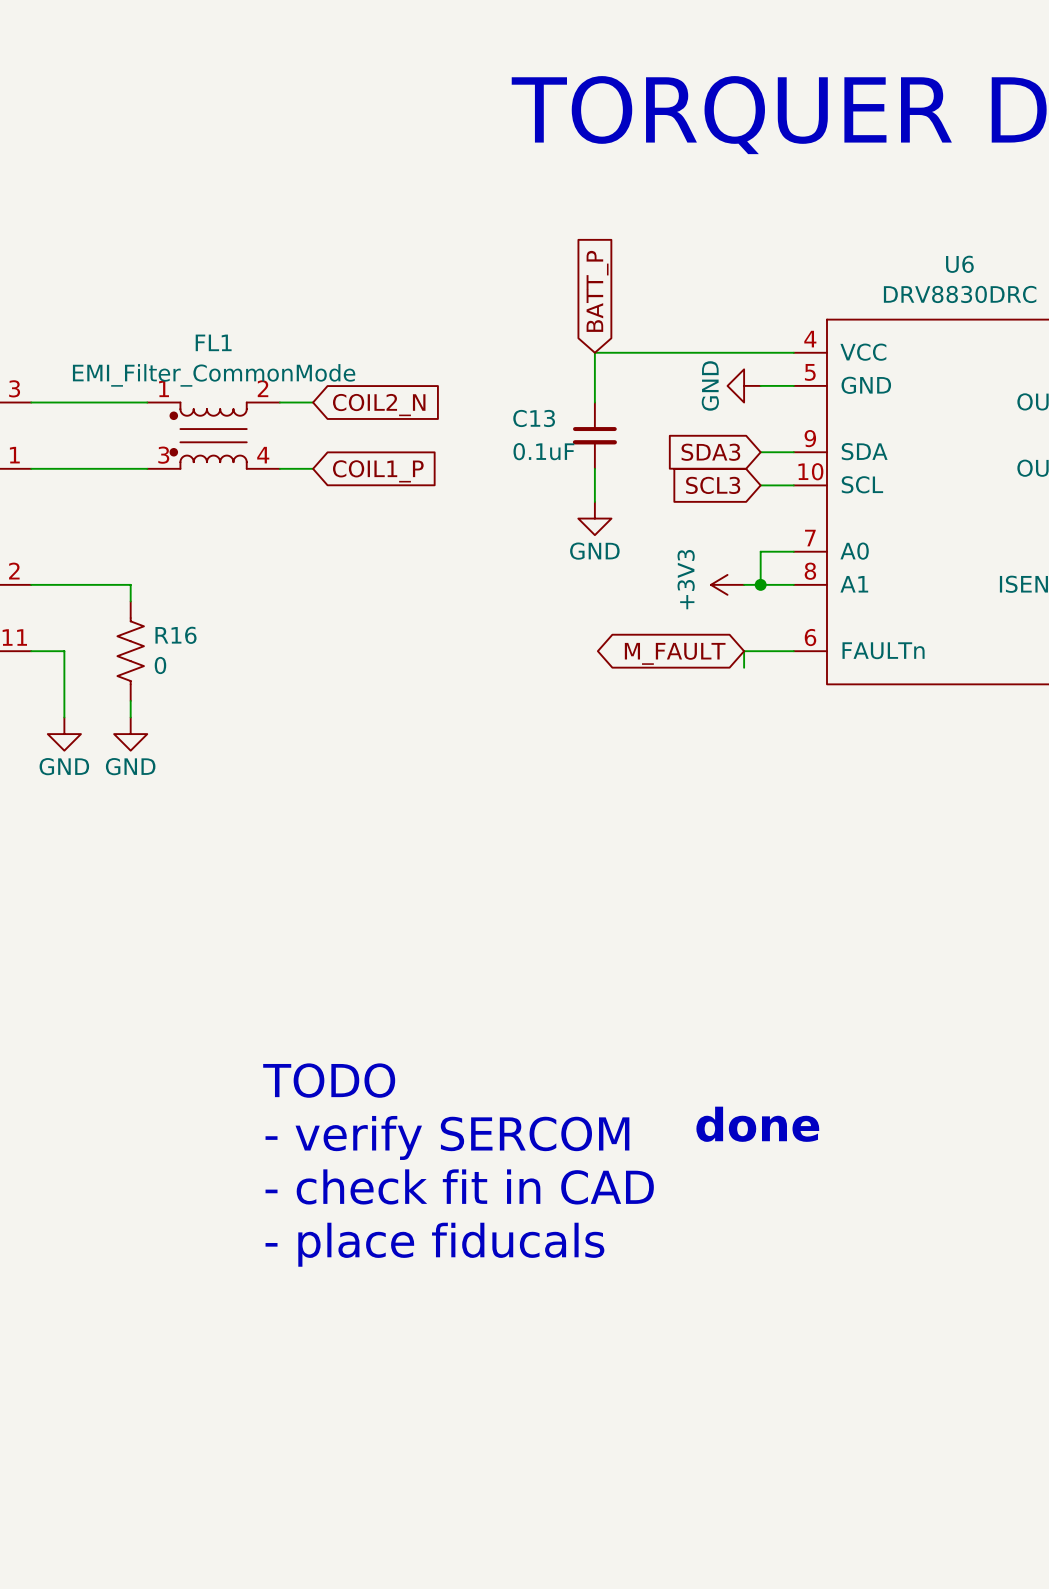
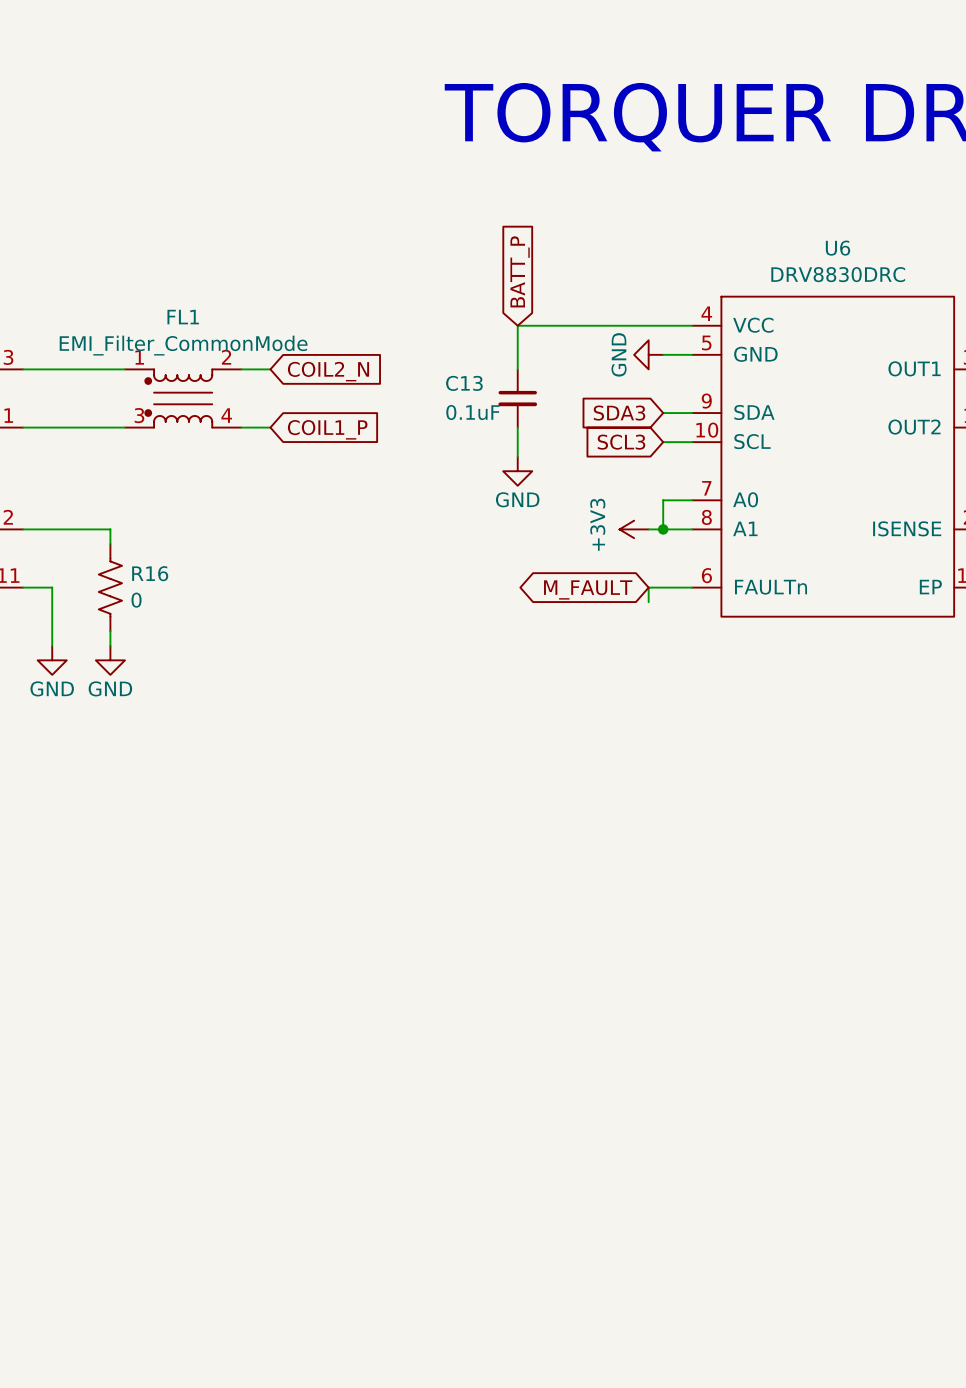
text: TODO (329, 1080) -> none
text: done (757, 1124) -> none
text: - verify SERCOM (447, 1137) -> none
text: - check fit in CAD (459, 1186) -> none
text: - place fiducals (434, 1244) -> none

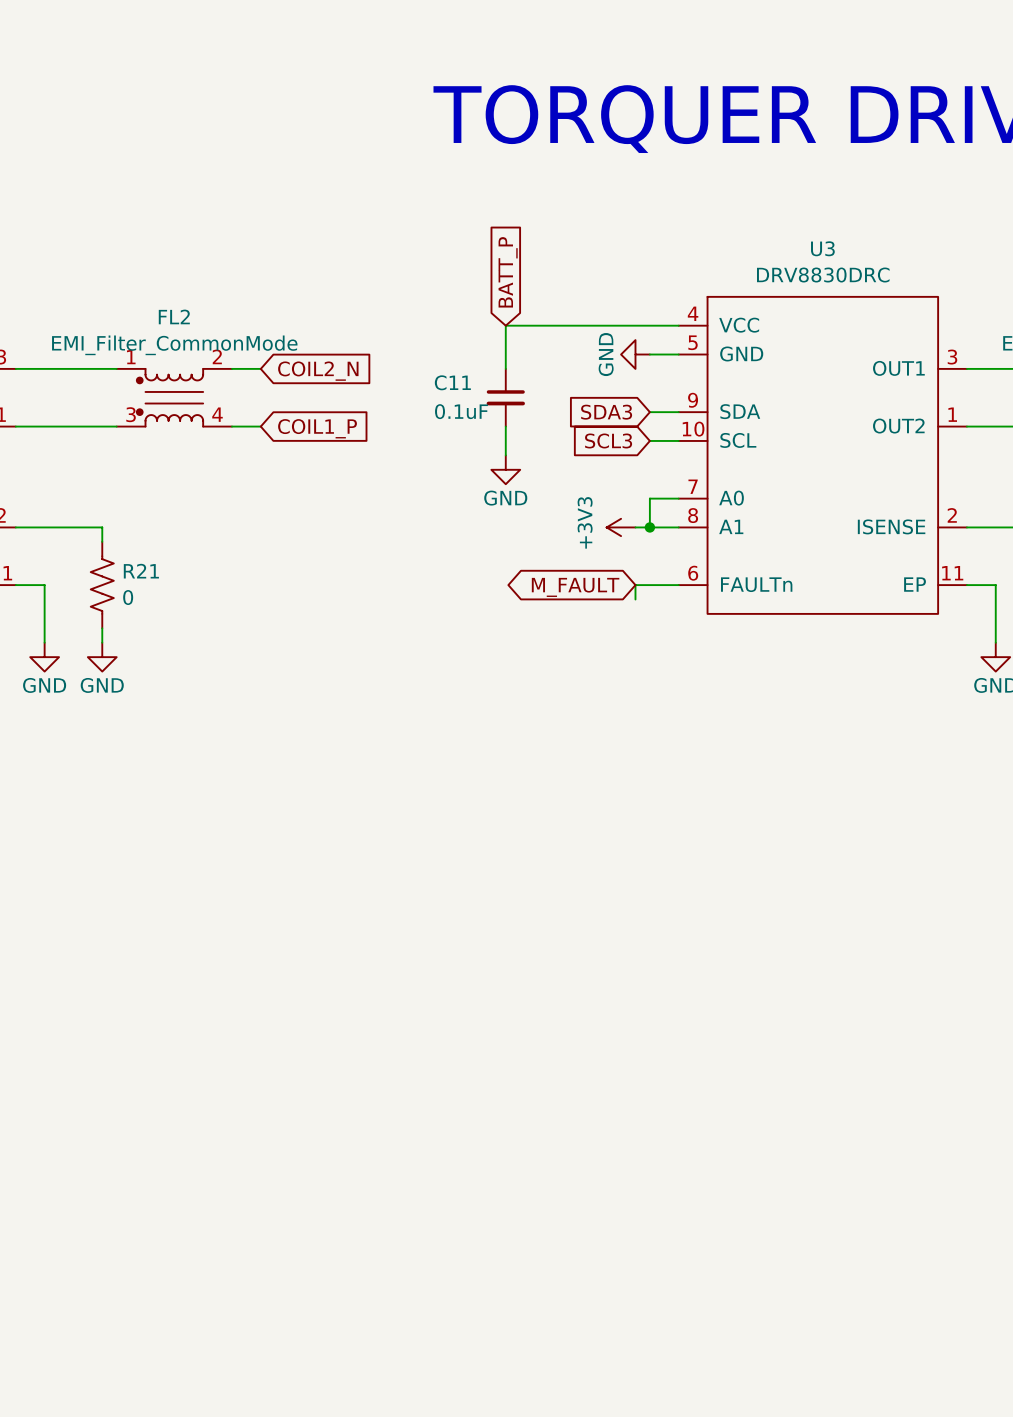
U6 name: U6 (838, 248) -> U3 (822, 248)
FL1 name: FL1 (183, 317) -> FL2 (174, 316)
C13 name: C13 (464, 383) -> C11 (452, 382)
R16 name: R16 (150, 573) -> R21 (141, 571)

